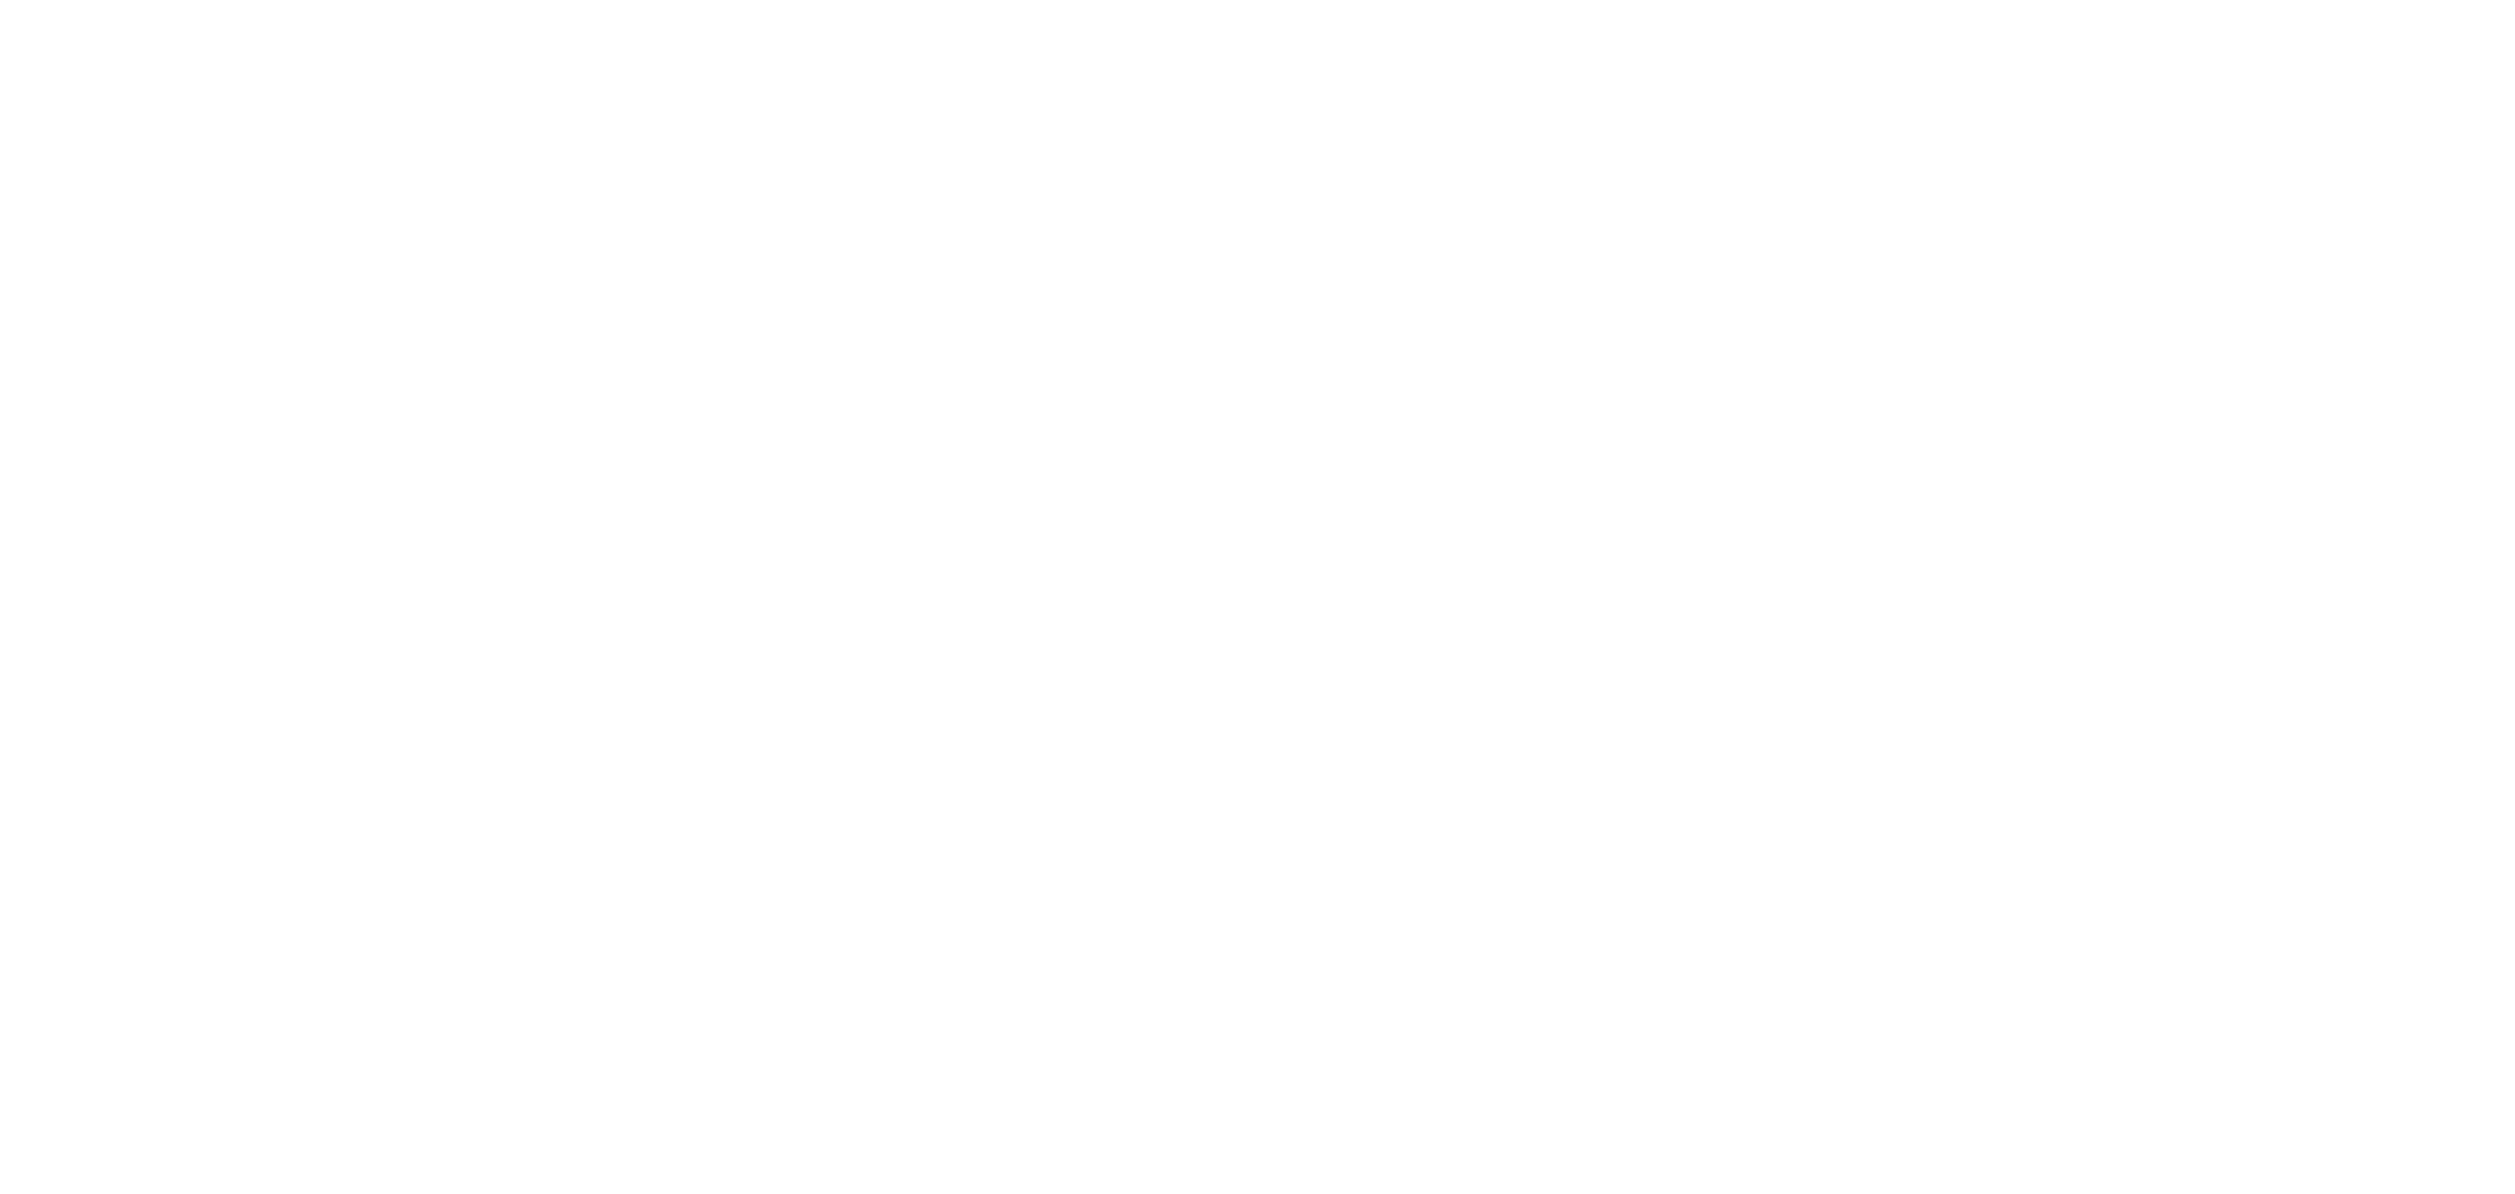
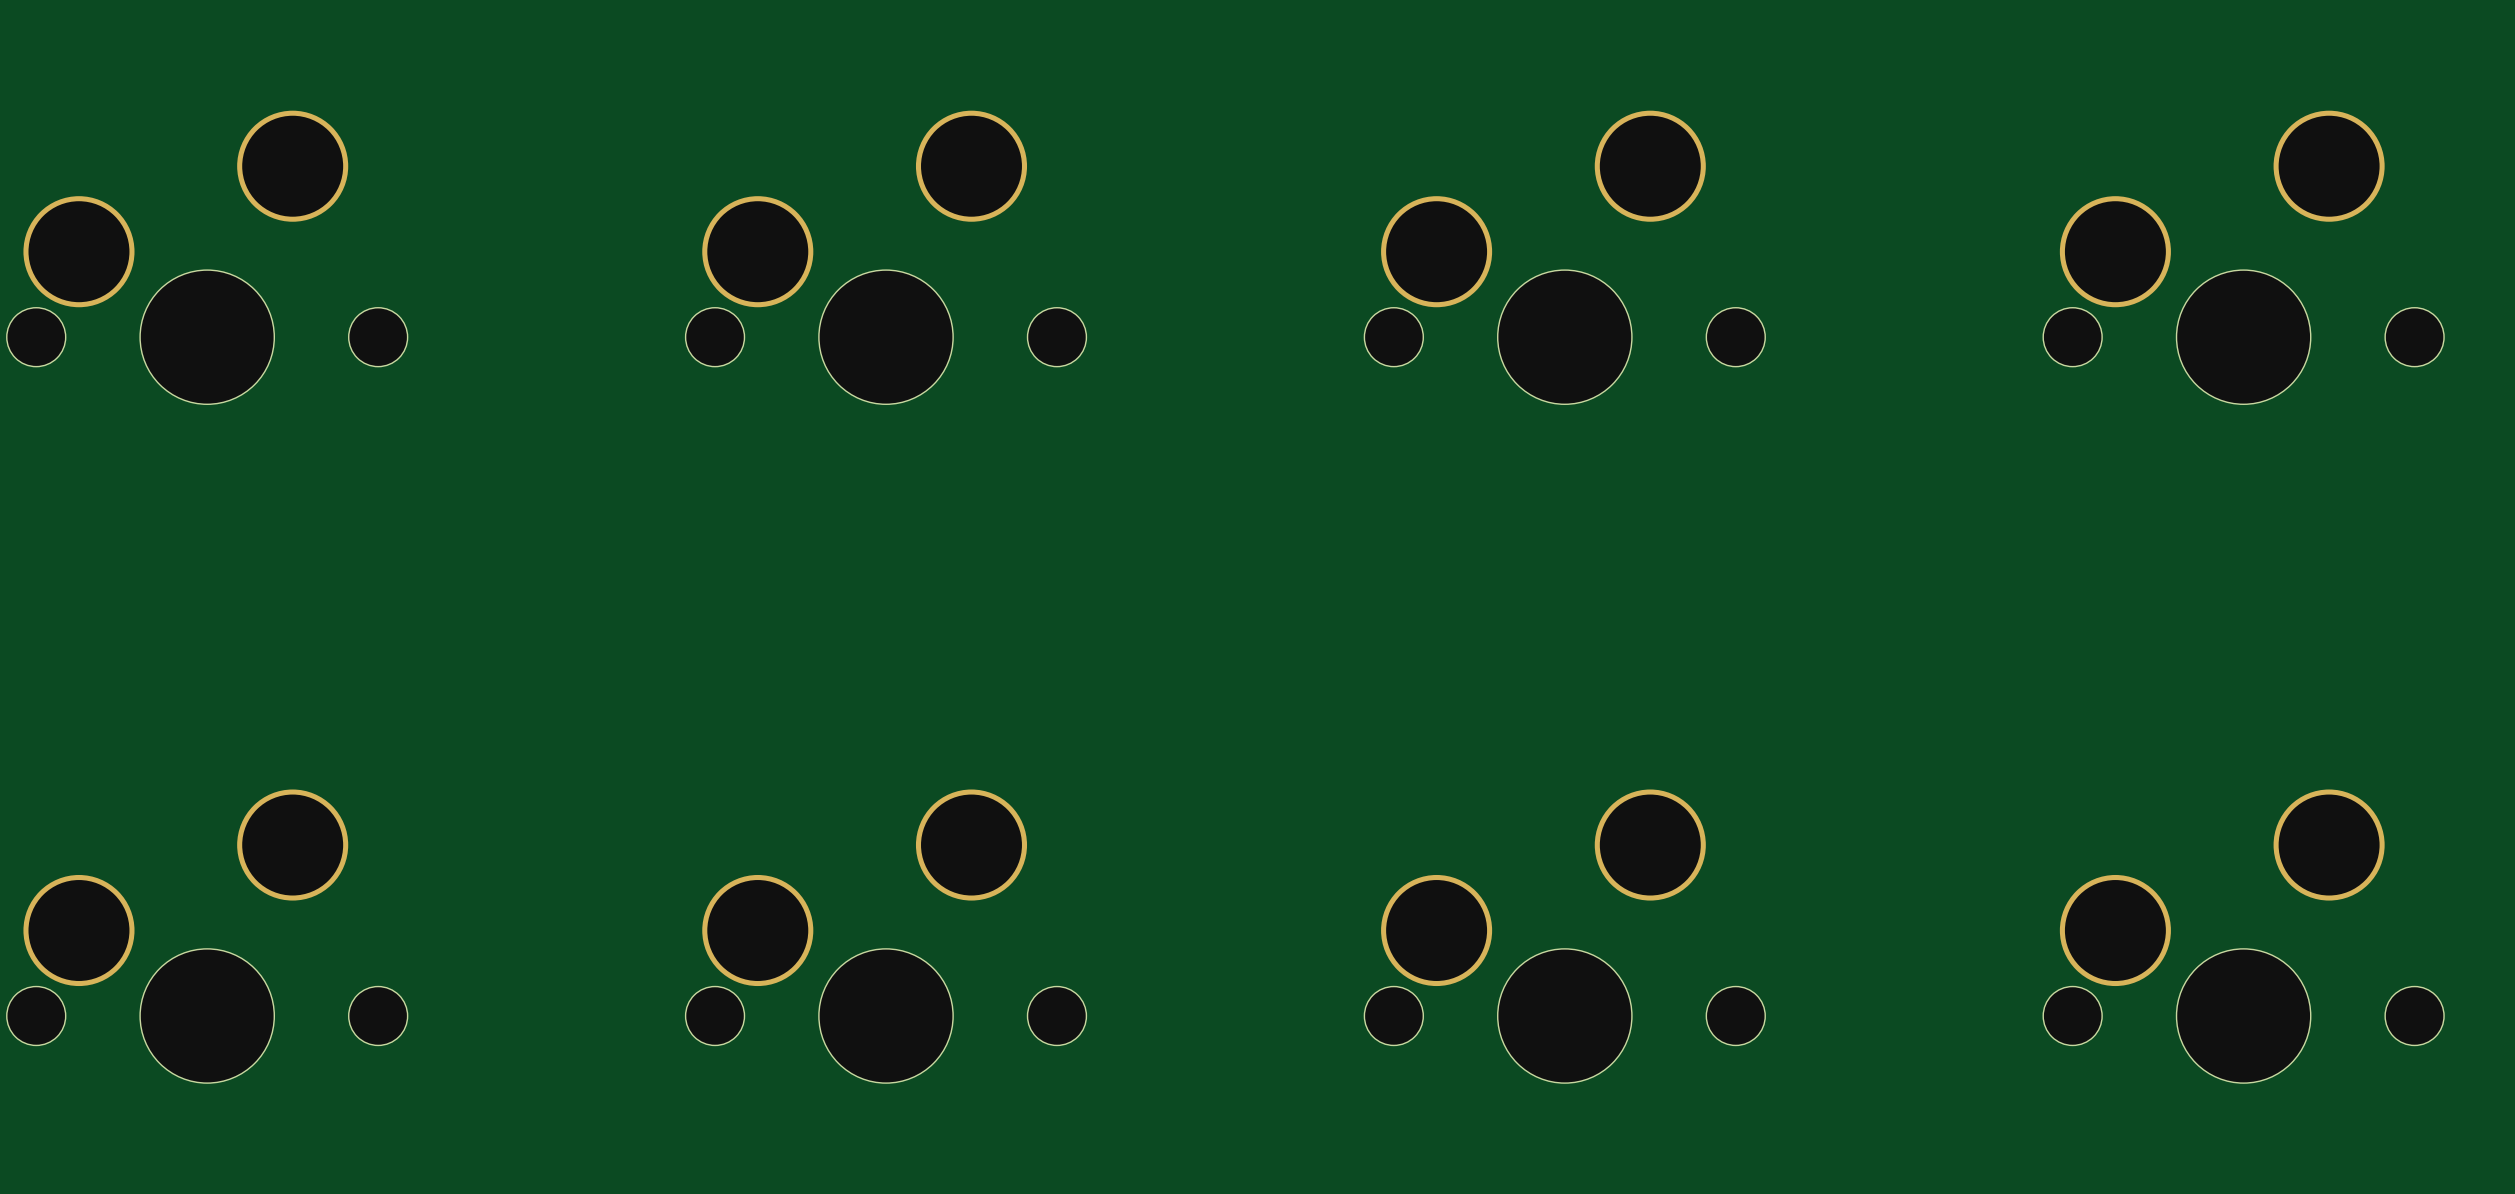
part: none -> (207, 257)
part: none -> (886, 257)
part: none -> (1564, 257)
part: none -> (2243, 257)
part: none -> (207, 936)
part: none -> (886, 936)
part: none -> (1564, 936)
part: none -> (2243, 936)

